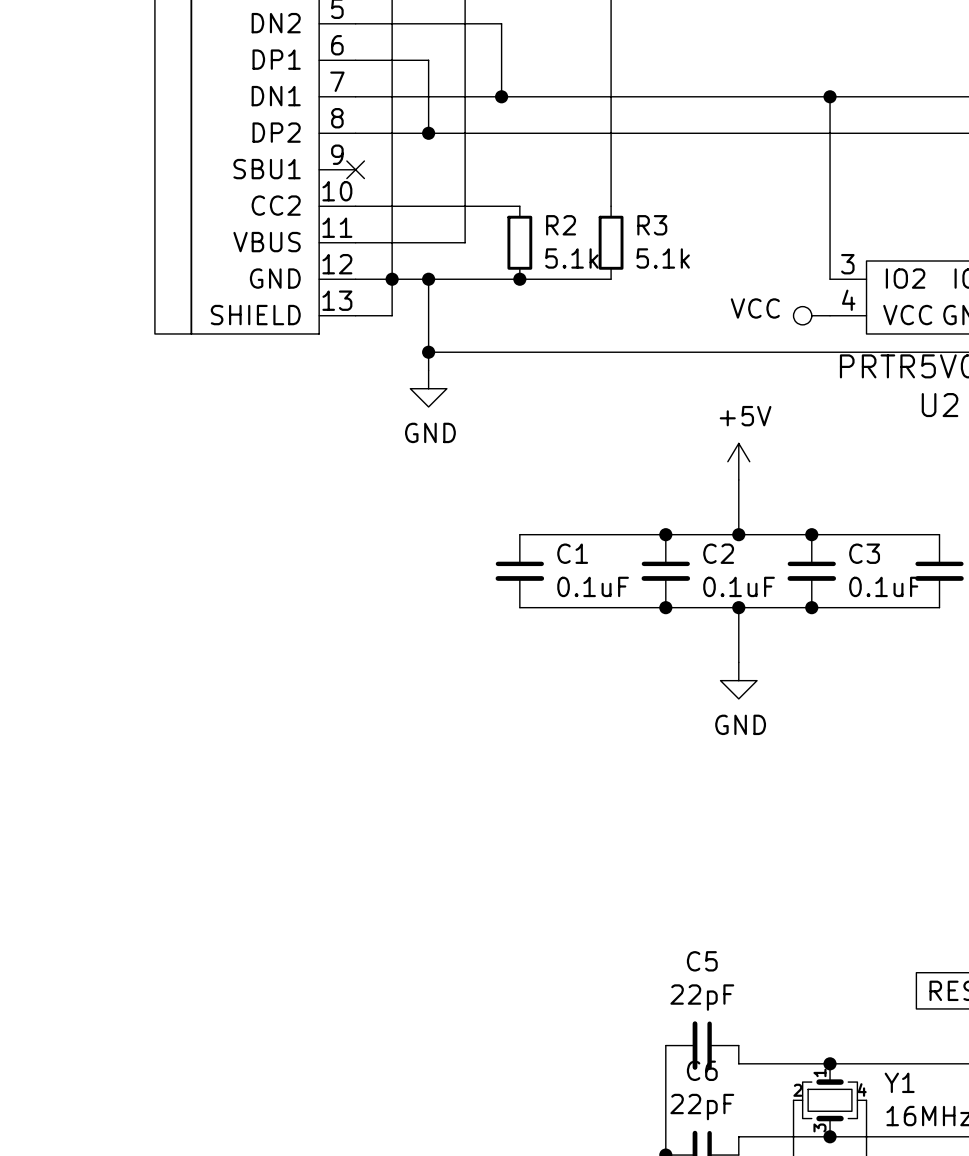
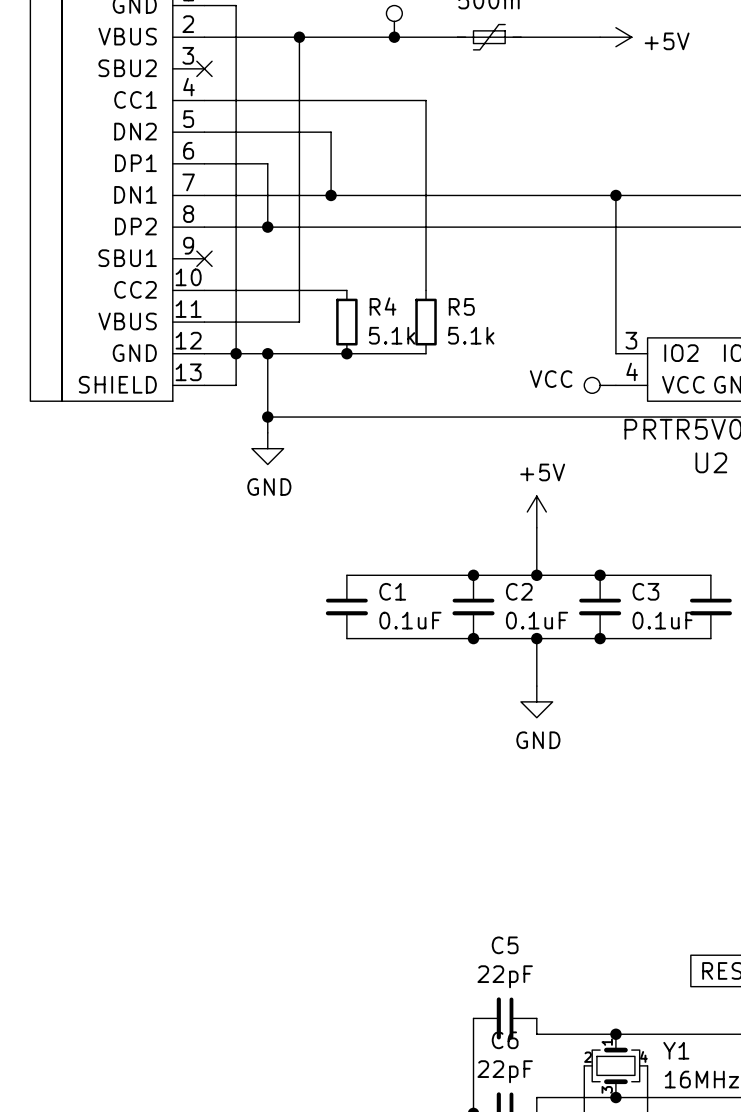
R2 name: R2 (561, 225) -> R4 (383, 306)
R3 name: R3 (652, 225) -> R5 (461, 306)

